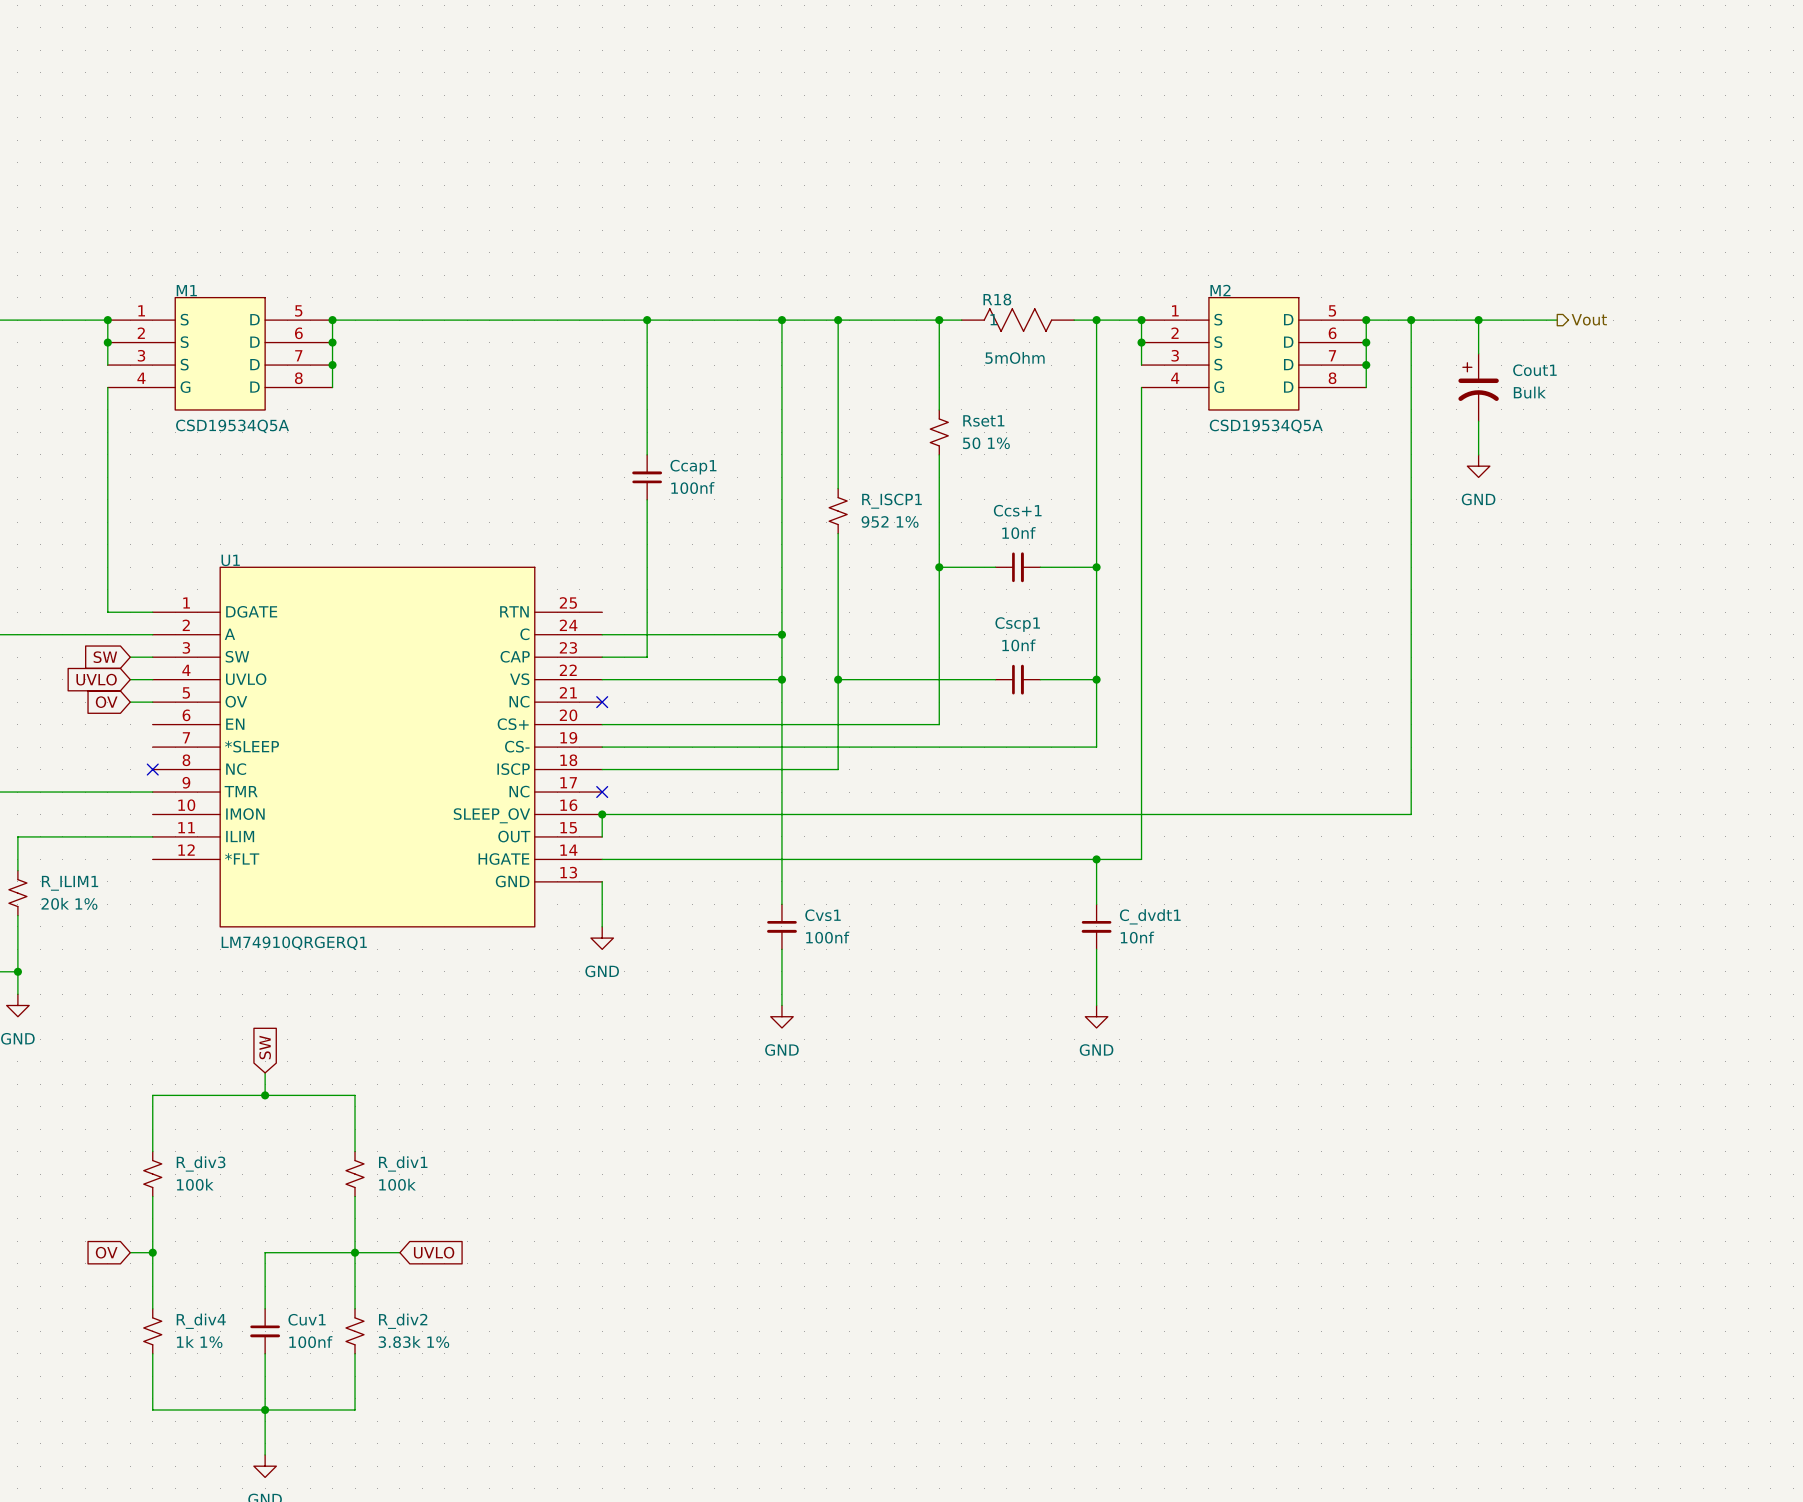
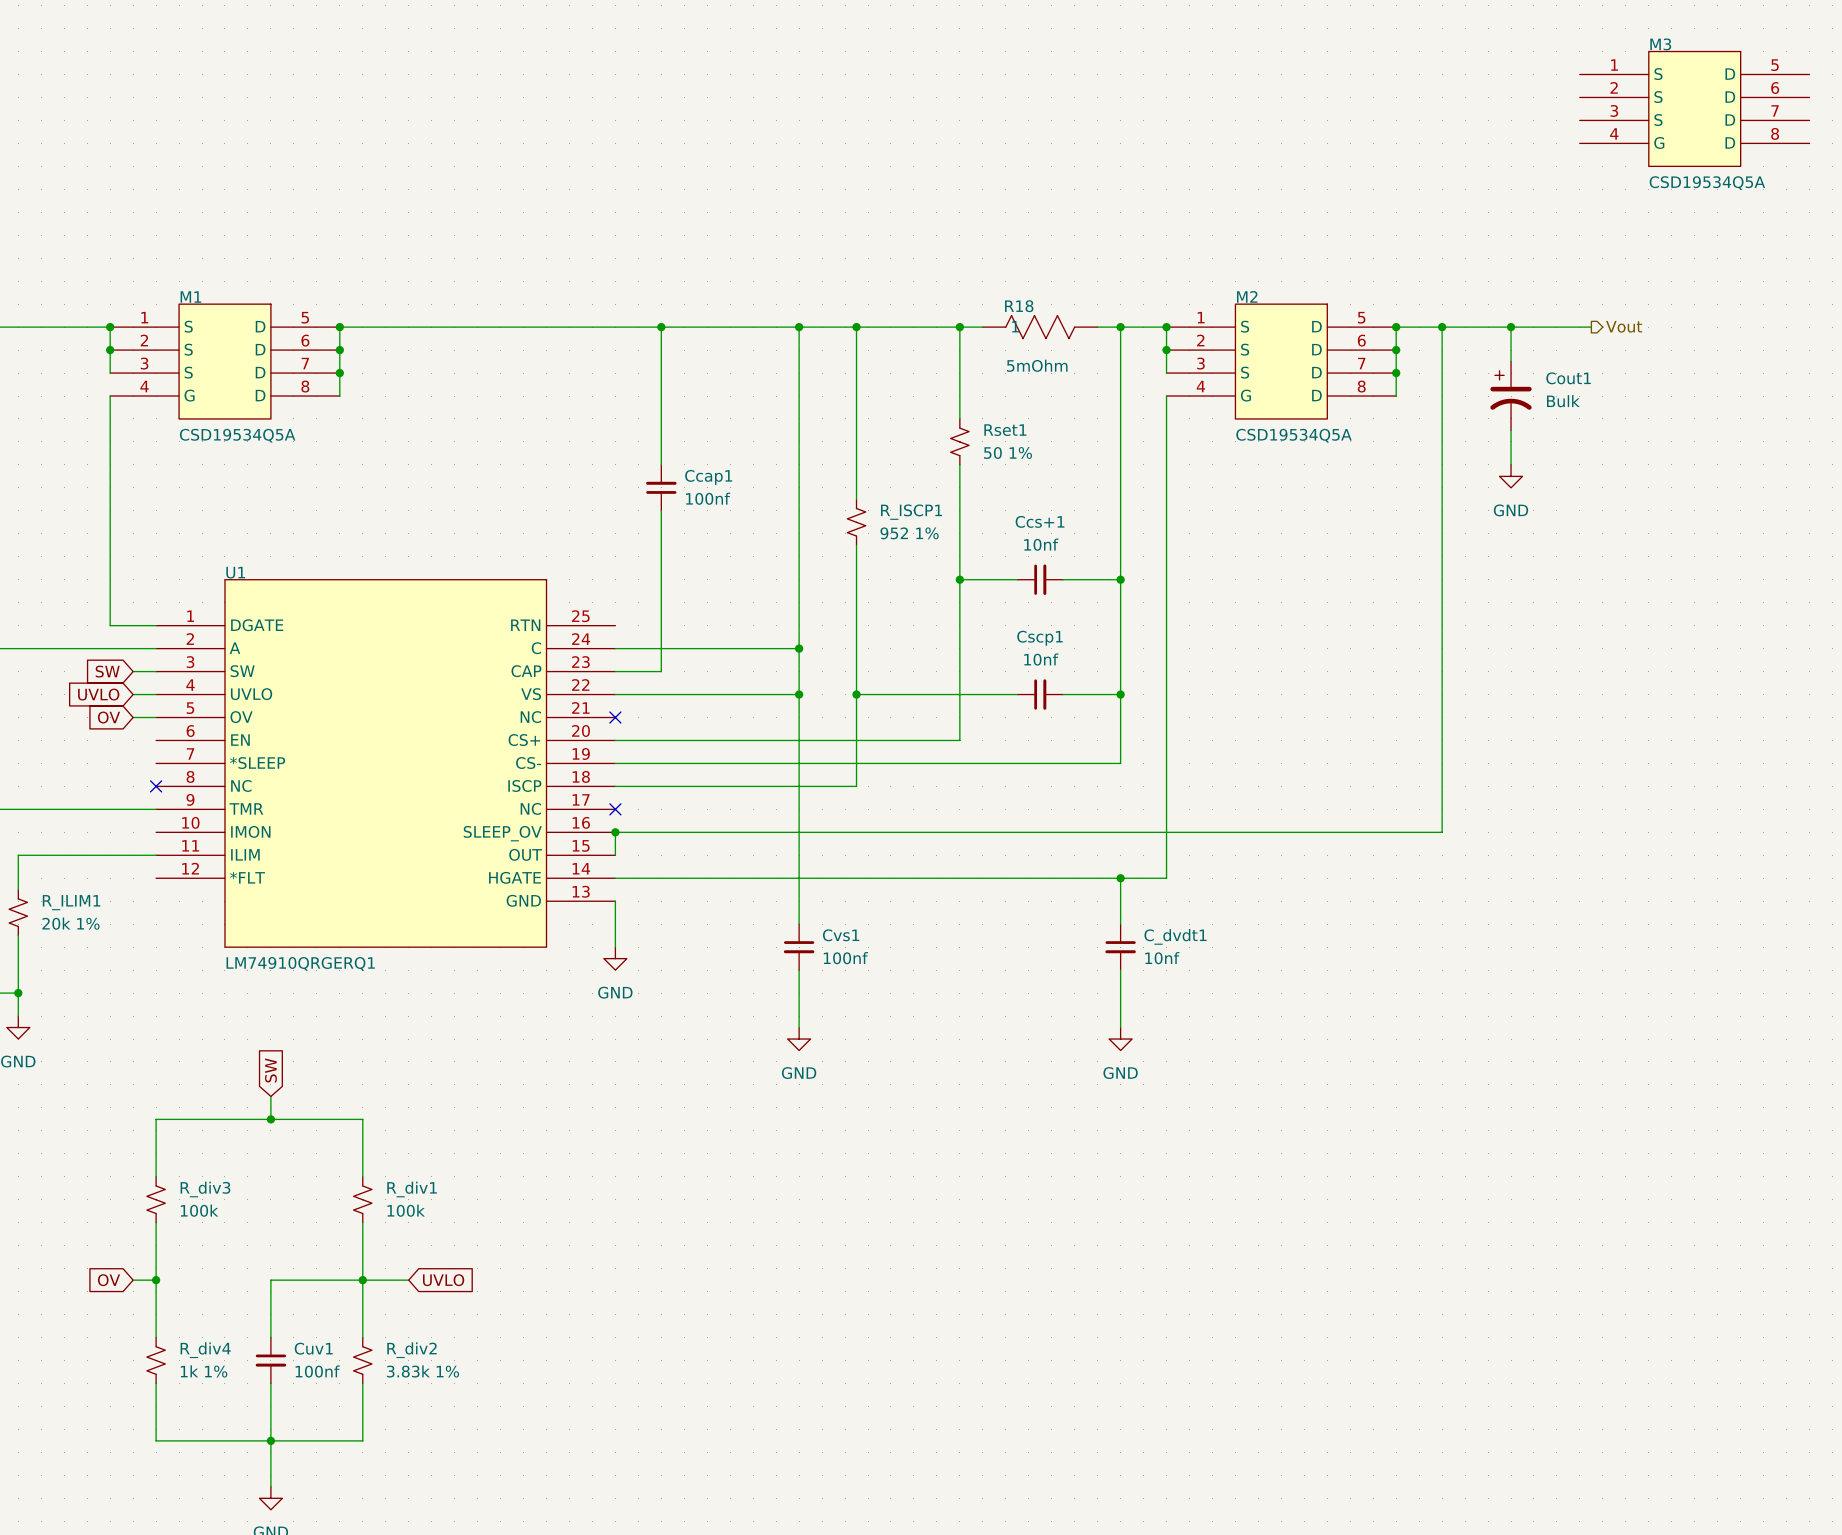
M3: none -> CSD19534Q5A (1694, 108)

